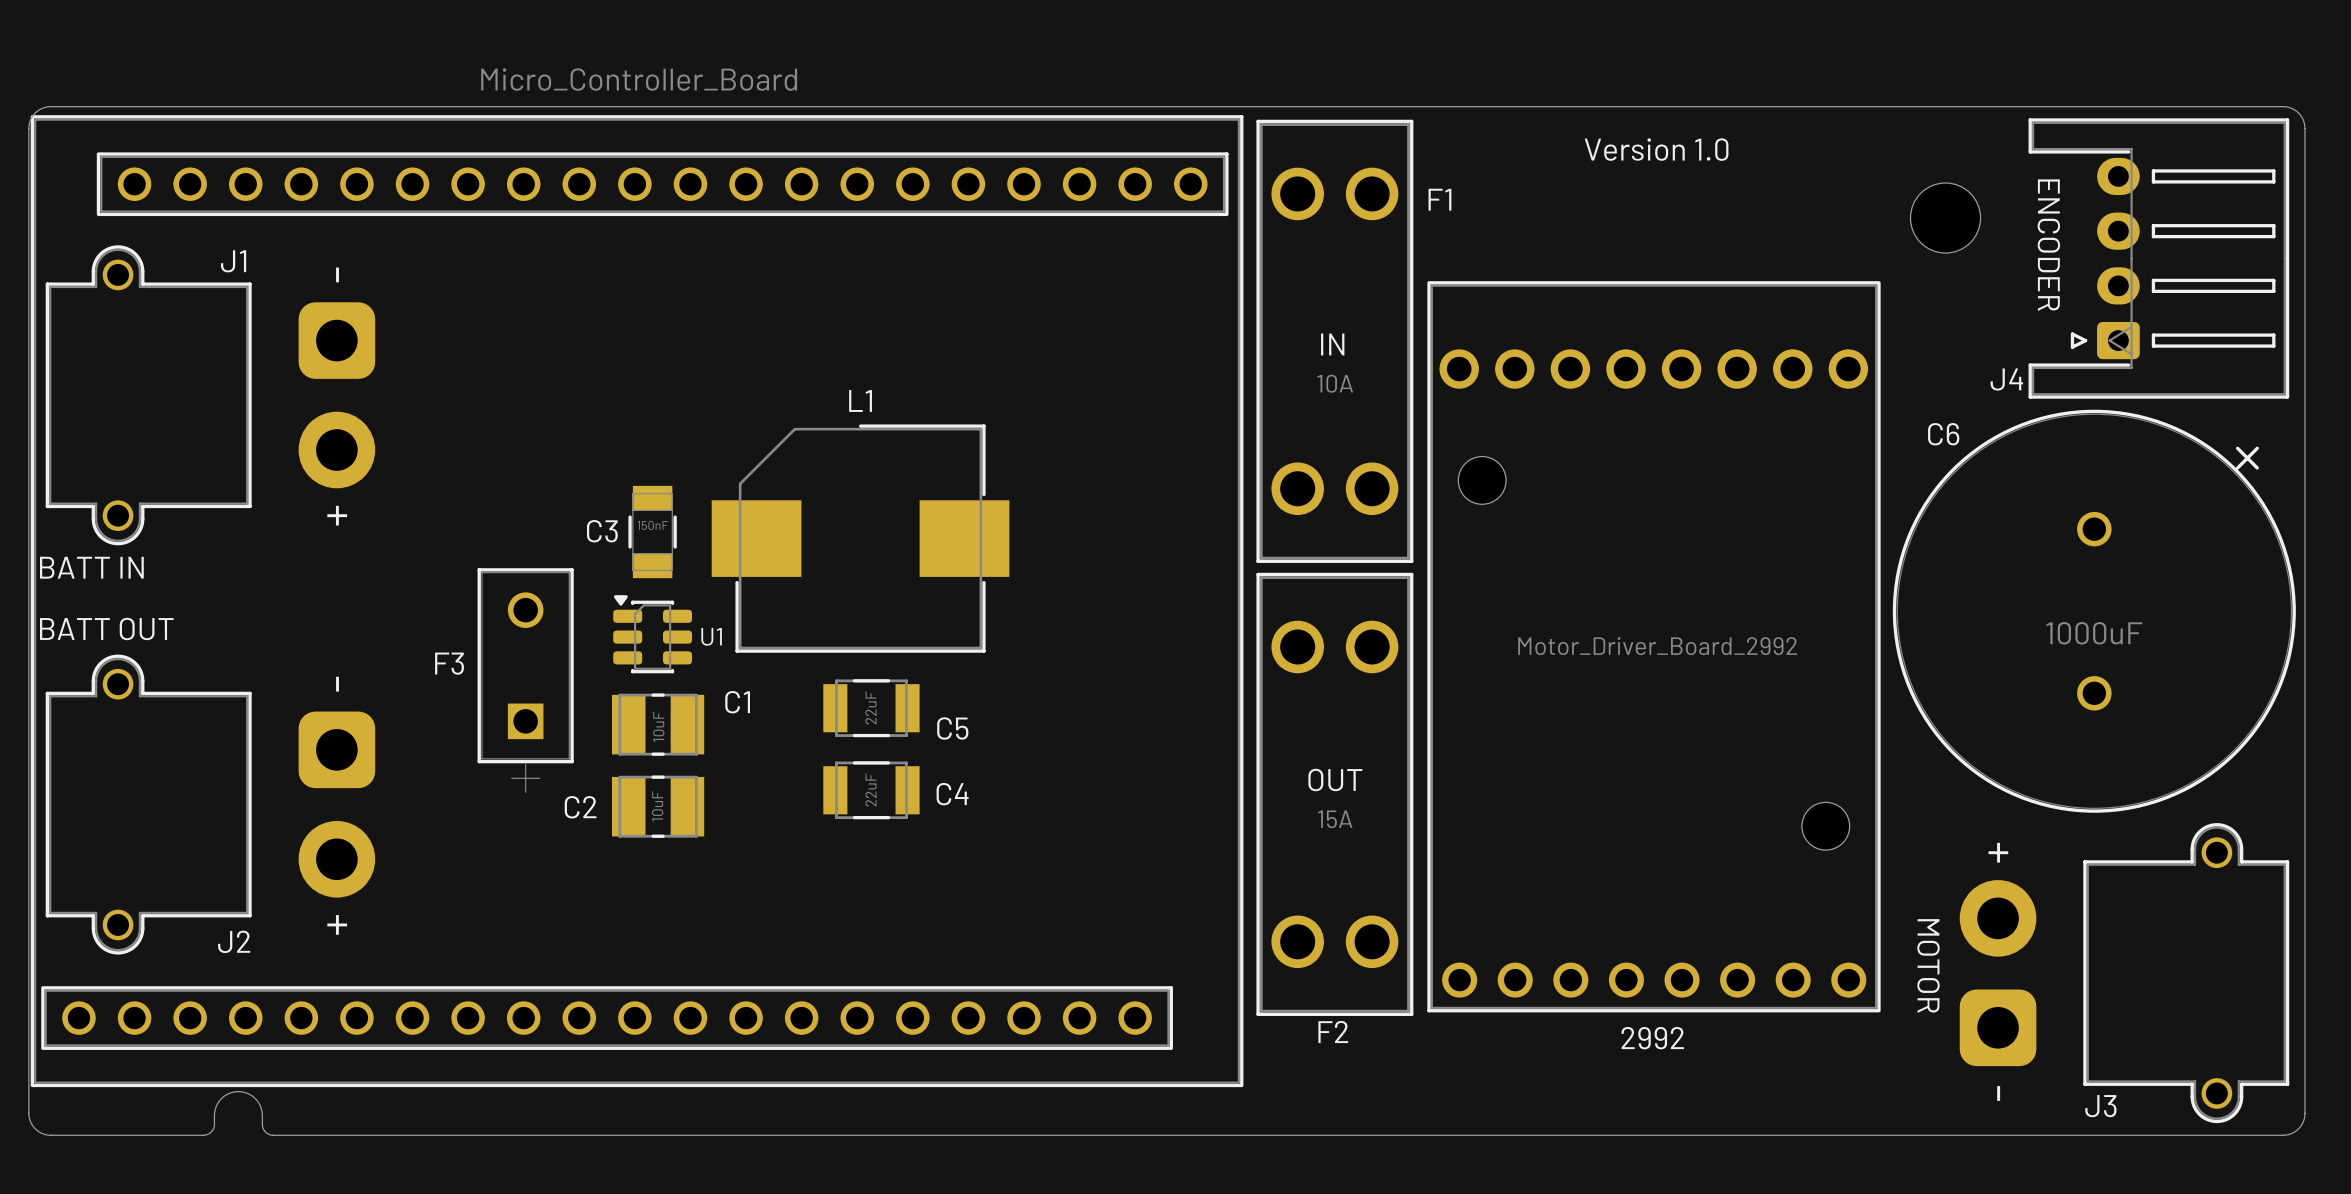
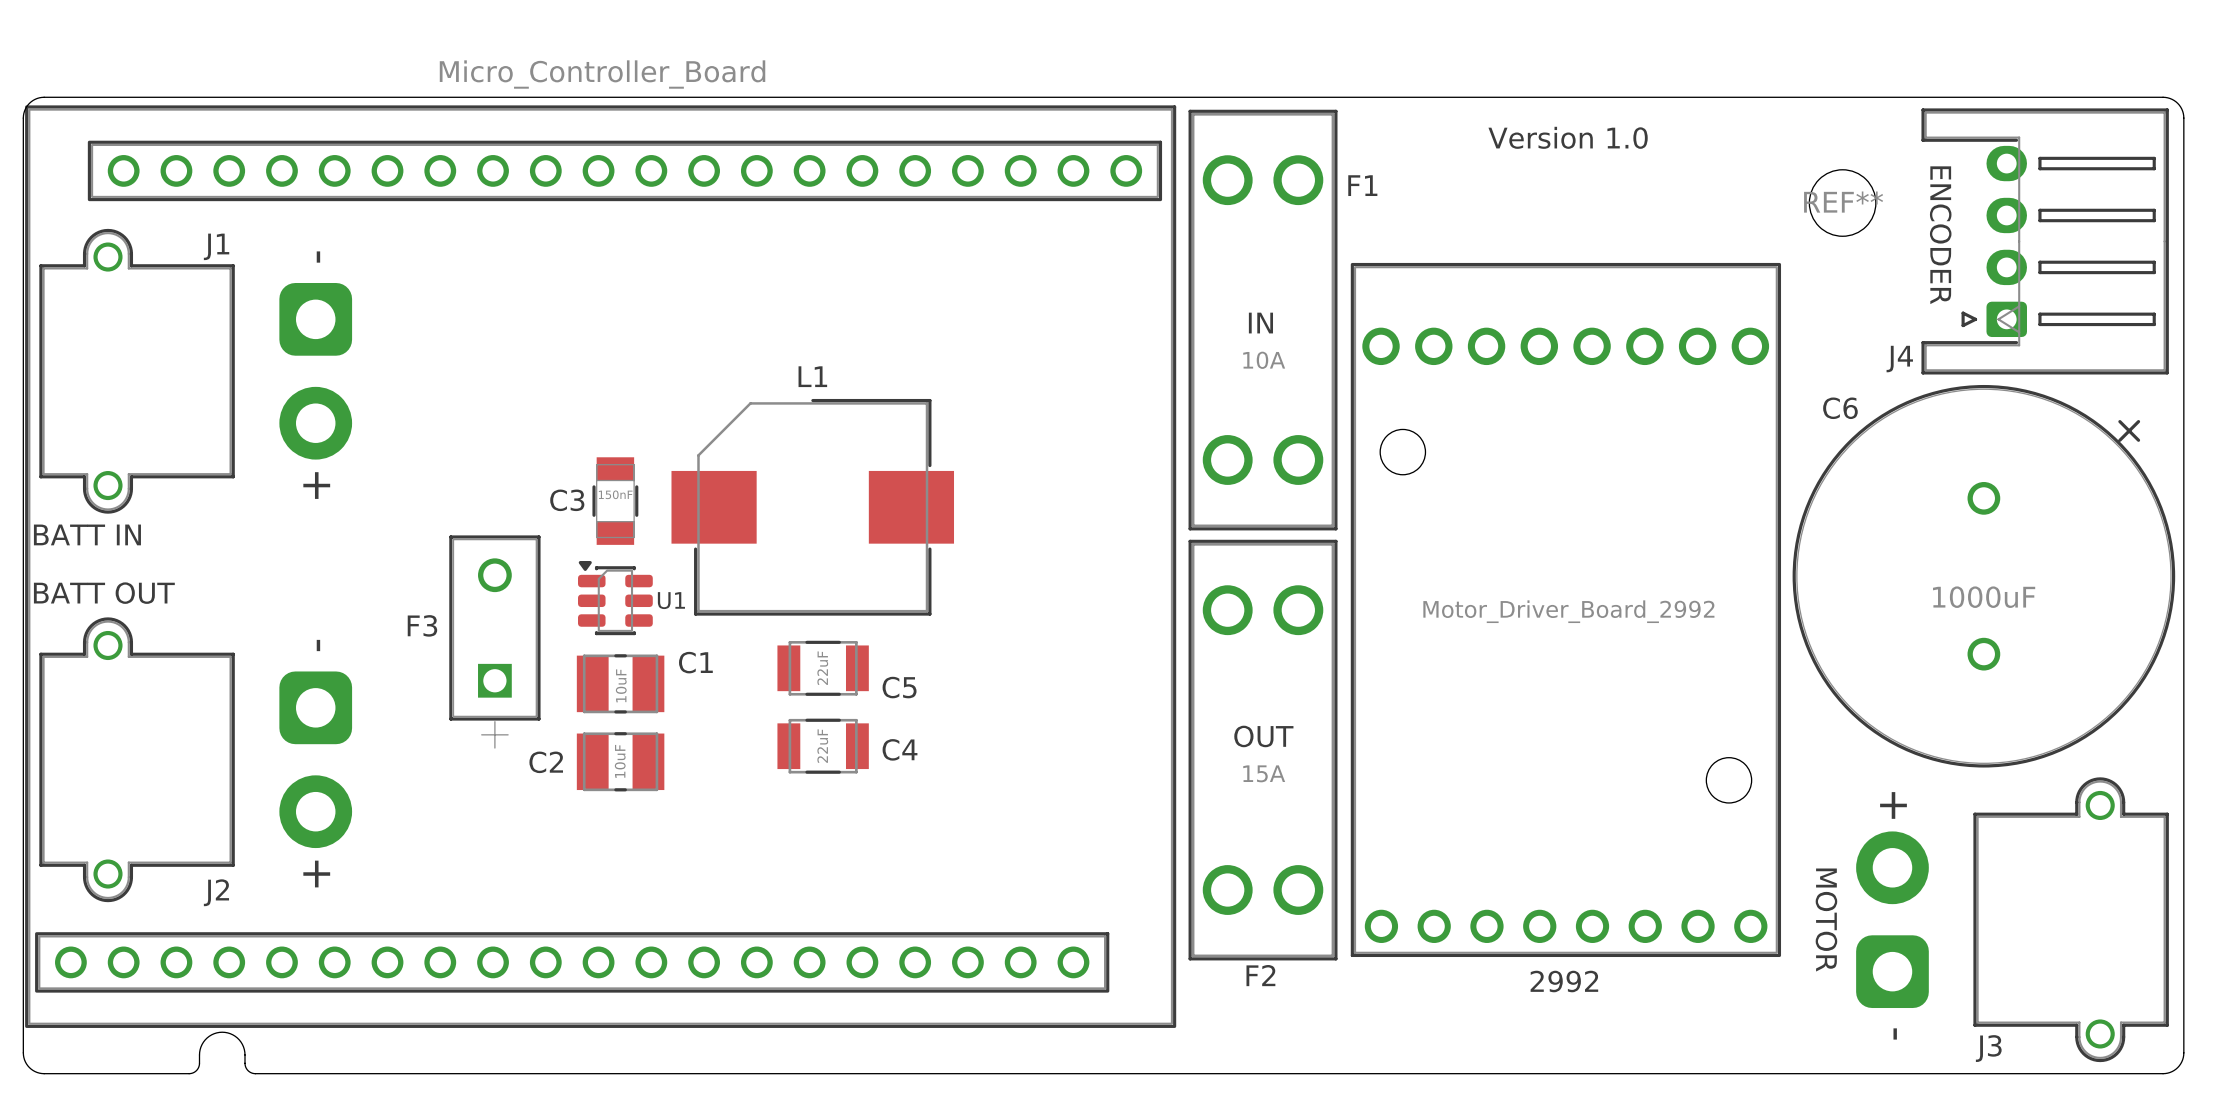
REF** name: none -> REF** (1843, 202)

